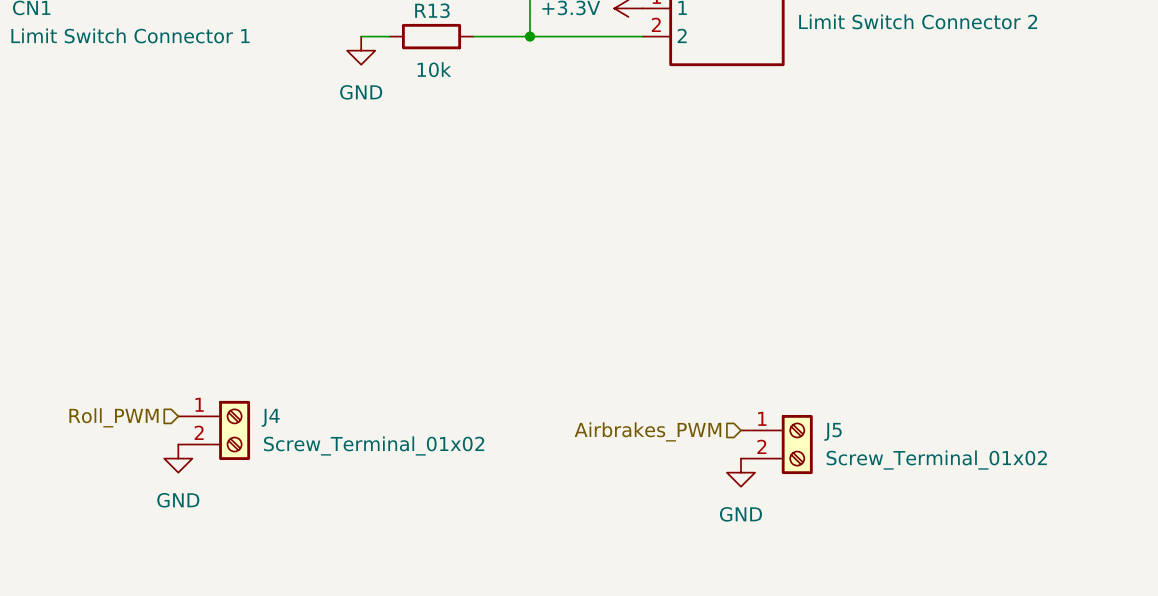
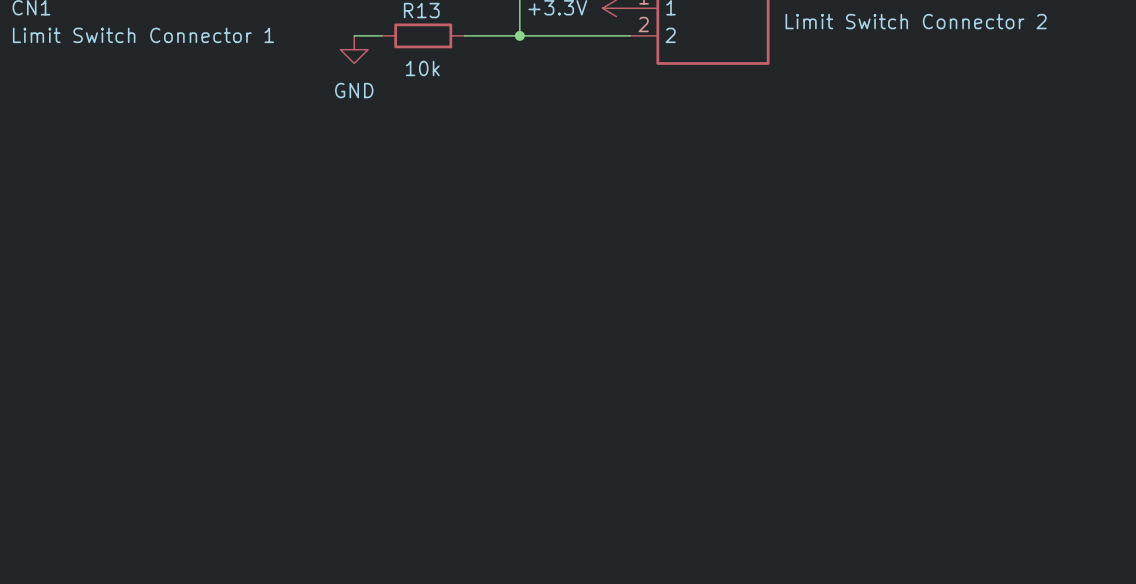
hierarchical label: Roll_PWM (113, 417) -> none
J4: Screw_Terminal_01x02 (214, 430) -> none
hierarchical label: Airbrakes_PWM (647, 431) -> none
J5: Screw_Terminal_01x02 (776, 444) -> none
power symbol: GND (178, 458) -> none
power symbol: GND (740, 472) -> none

